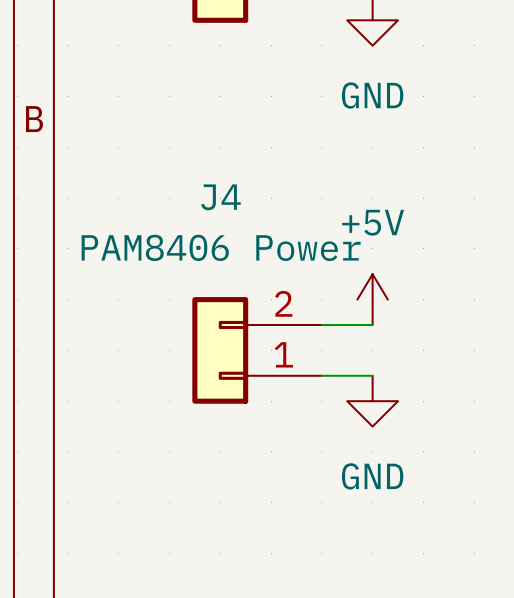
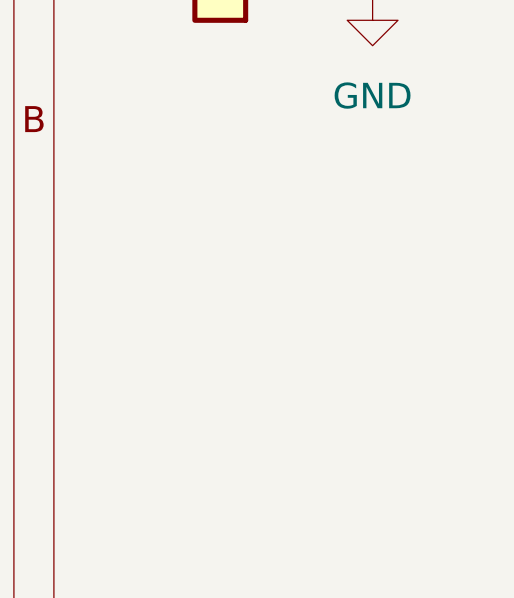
power symbol: +5V (372, 299) -> none
wire: (321, 325) (372, 325) -> none
J4: PAM8406 Power (257, 350) -> none
wire: (321, 375) (372, 375) -> none
power symbol: GND (372, 401) -> none

